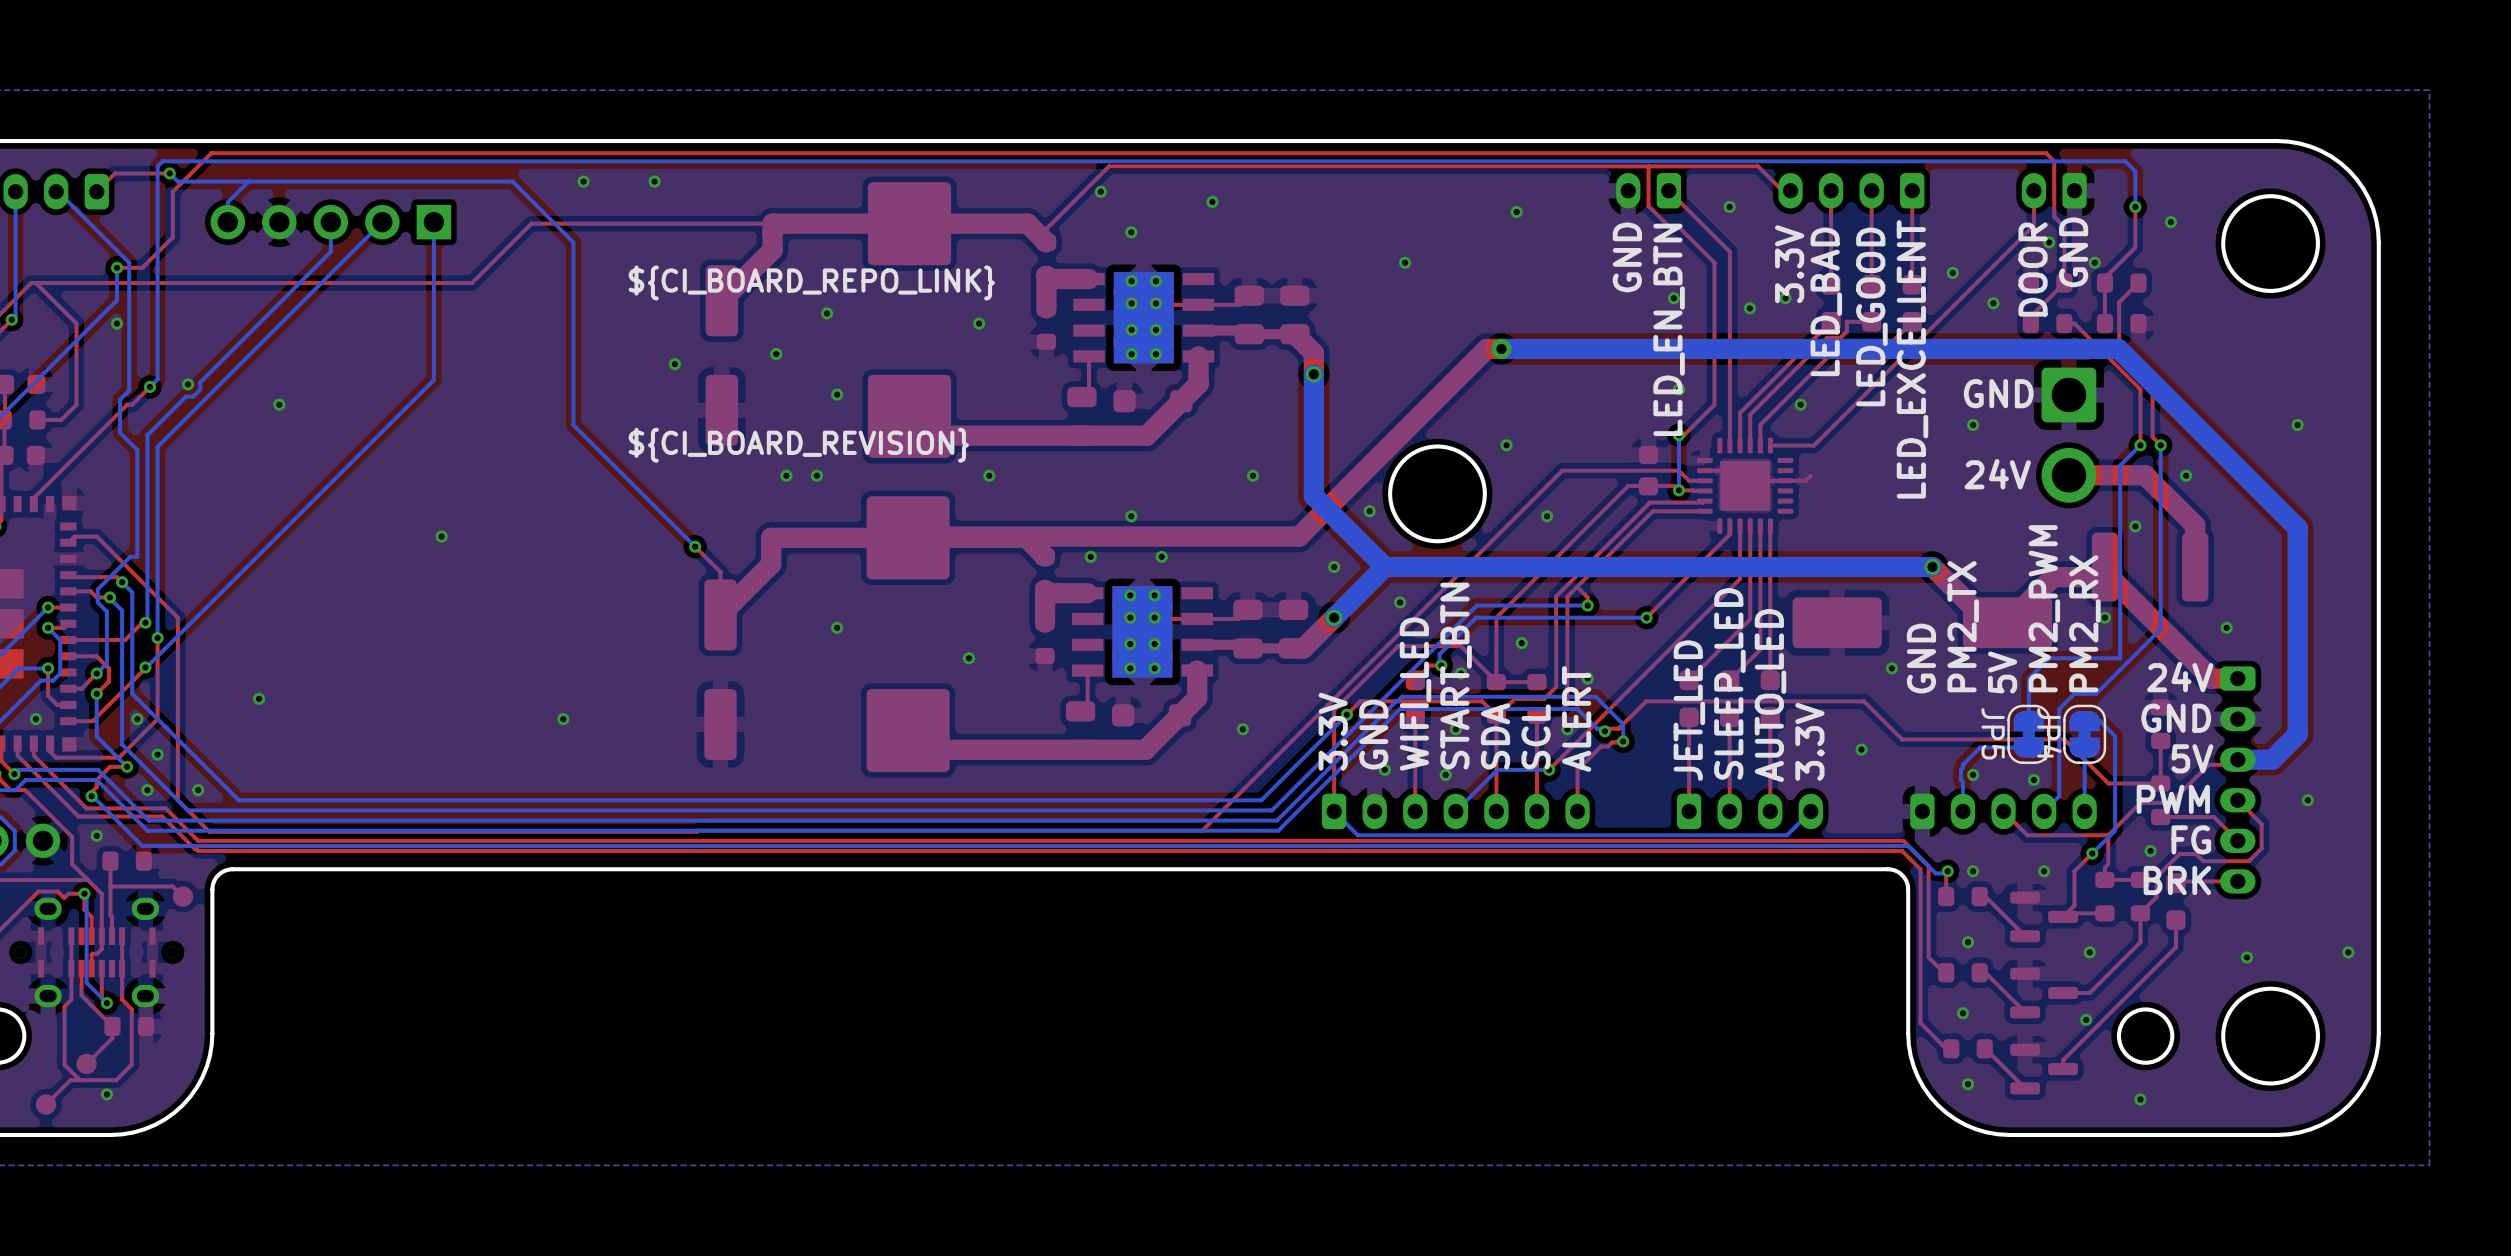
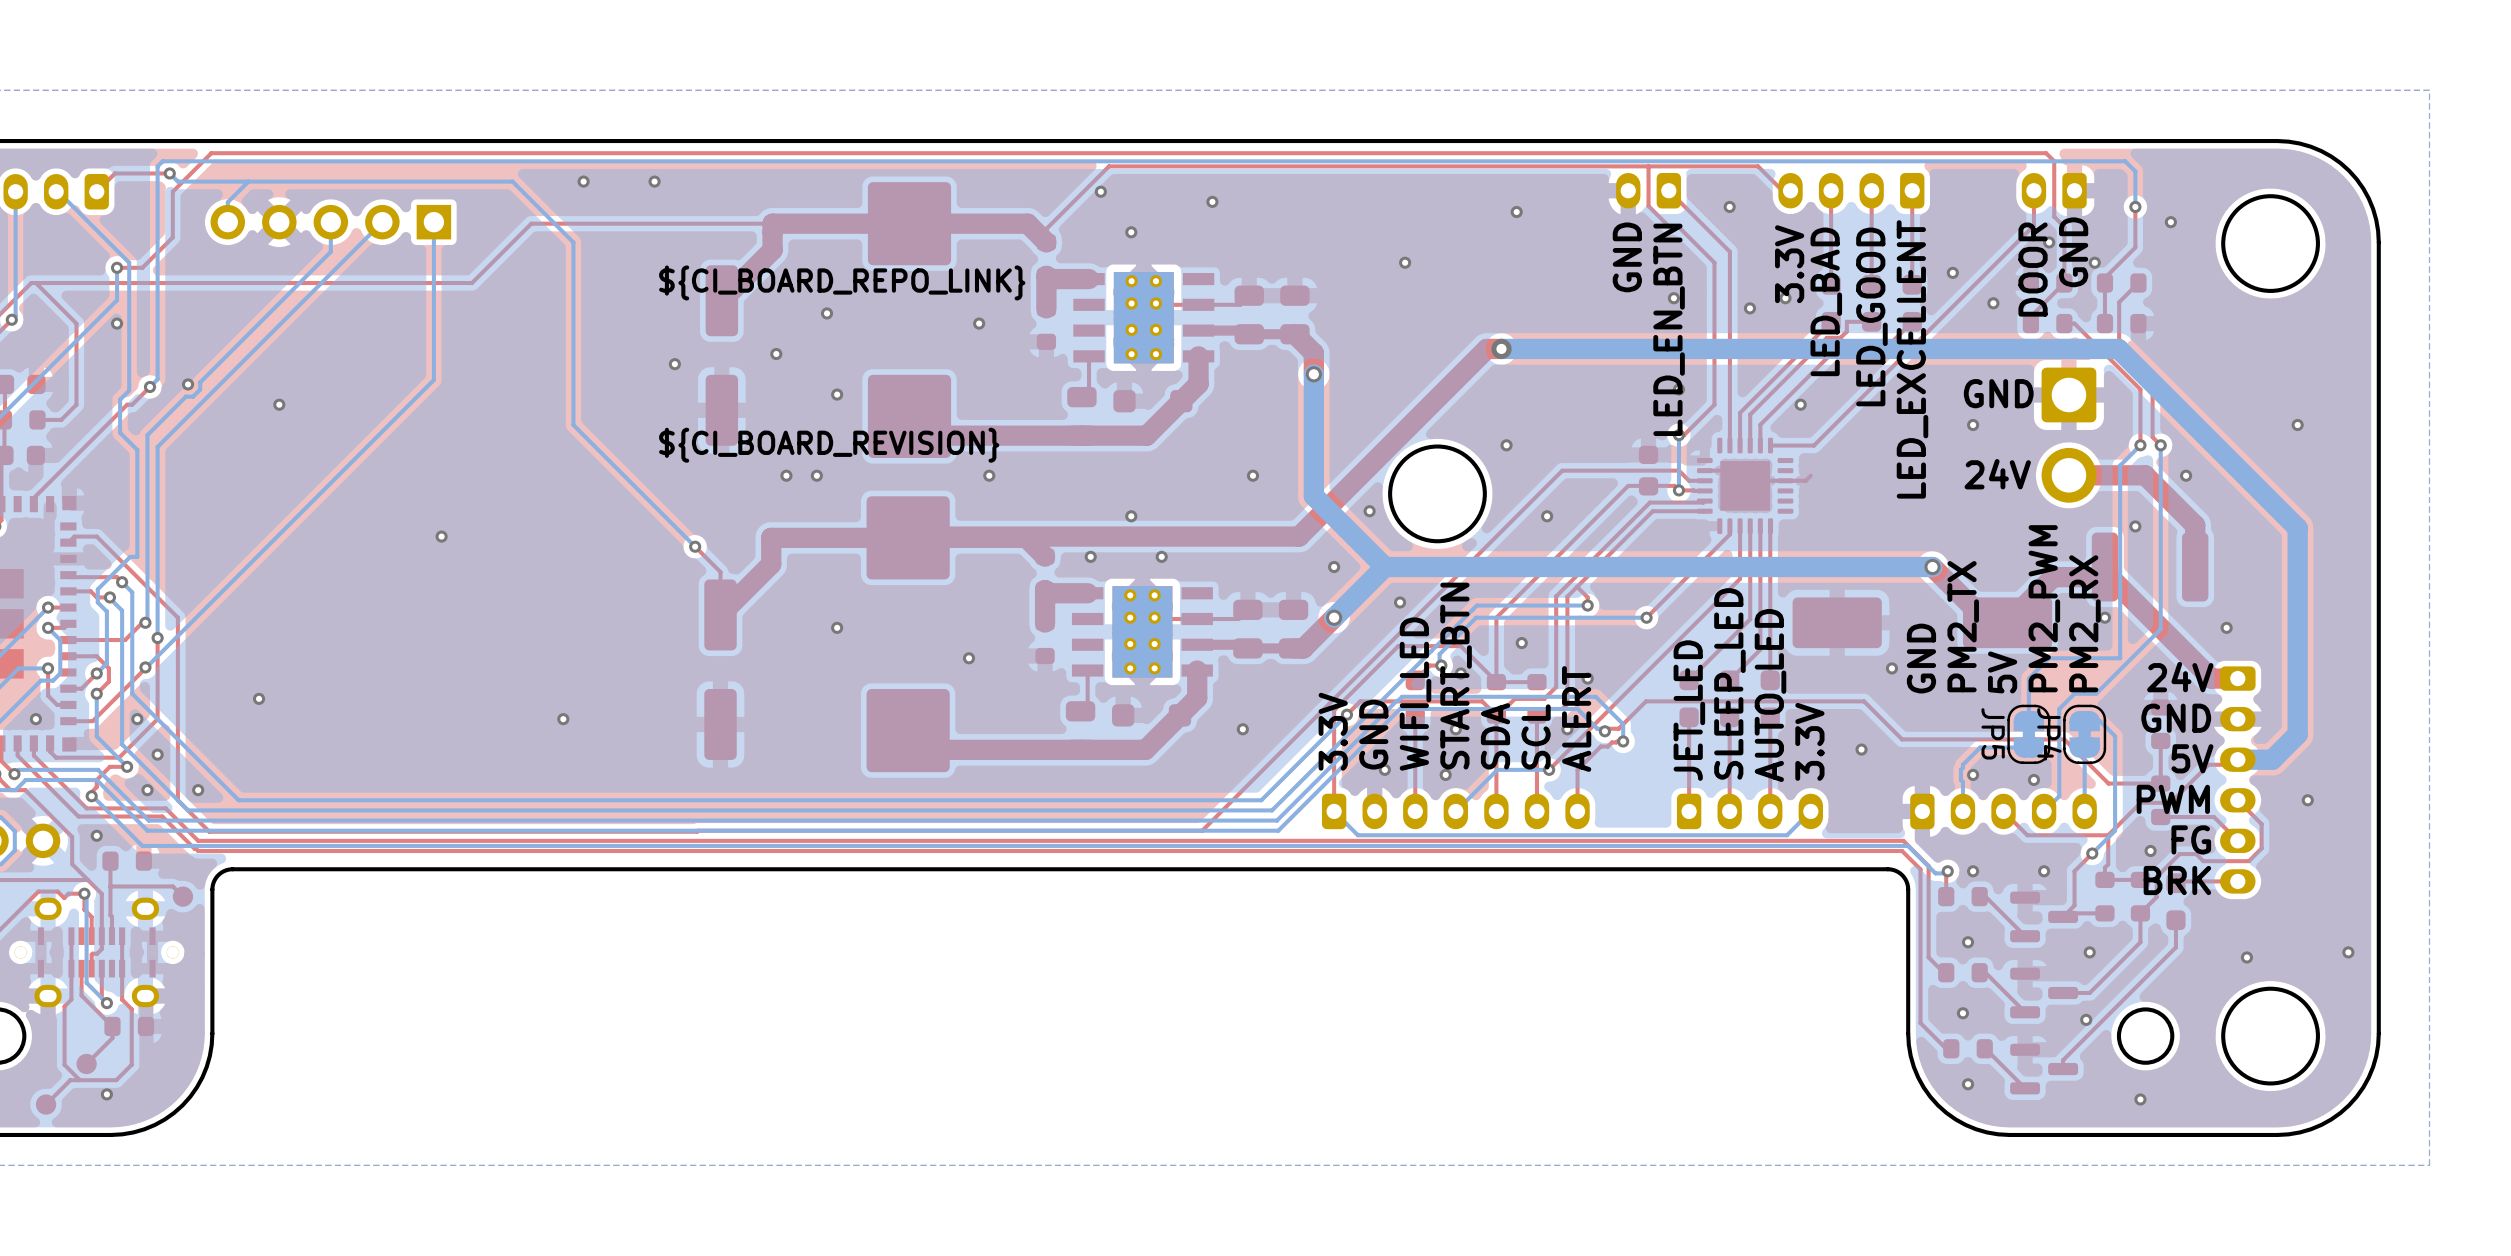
text position: ${CI_BOARD_REPO_LINK} (811, 282) -> ${CI_BOARD_REPO_LINK} (842, 282)
text position: ${CI_BOARD_REVISION} (798, 445) -> ${CI_BOARD_REVISION} (829, 445)

